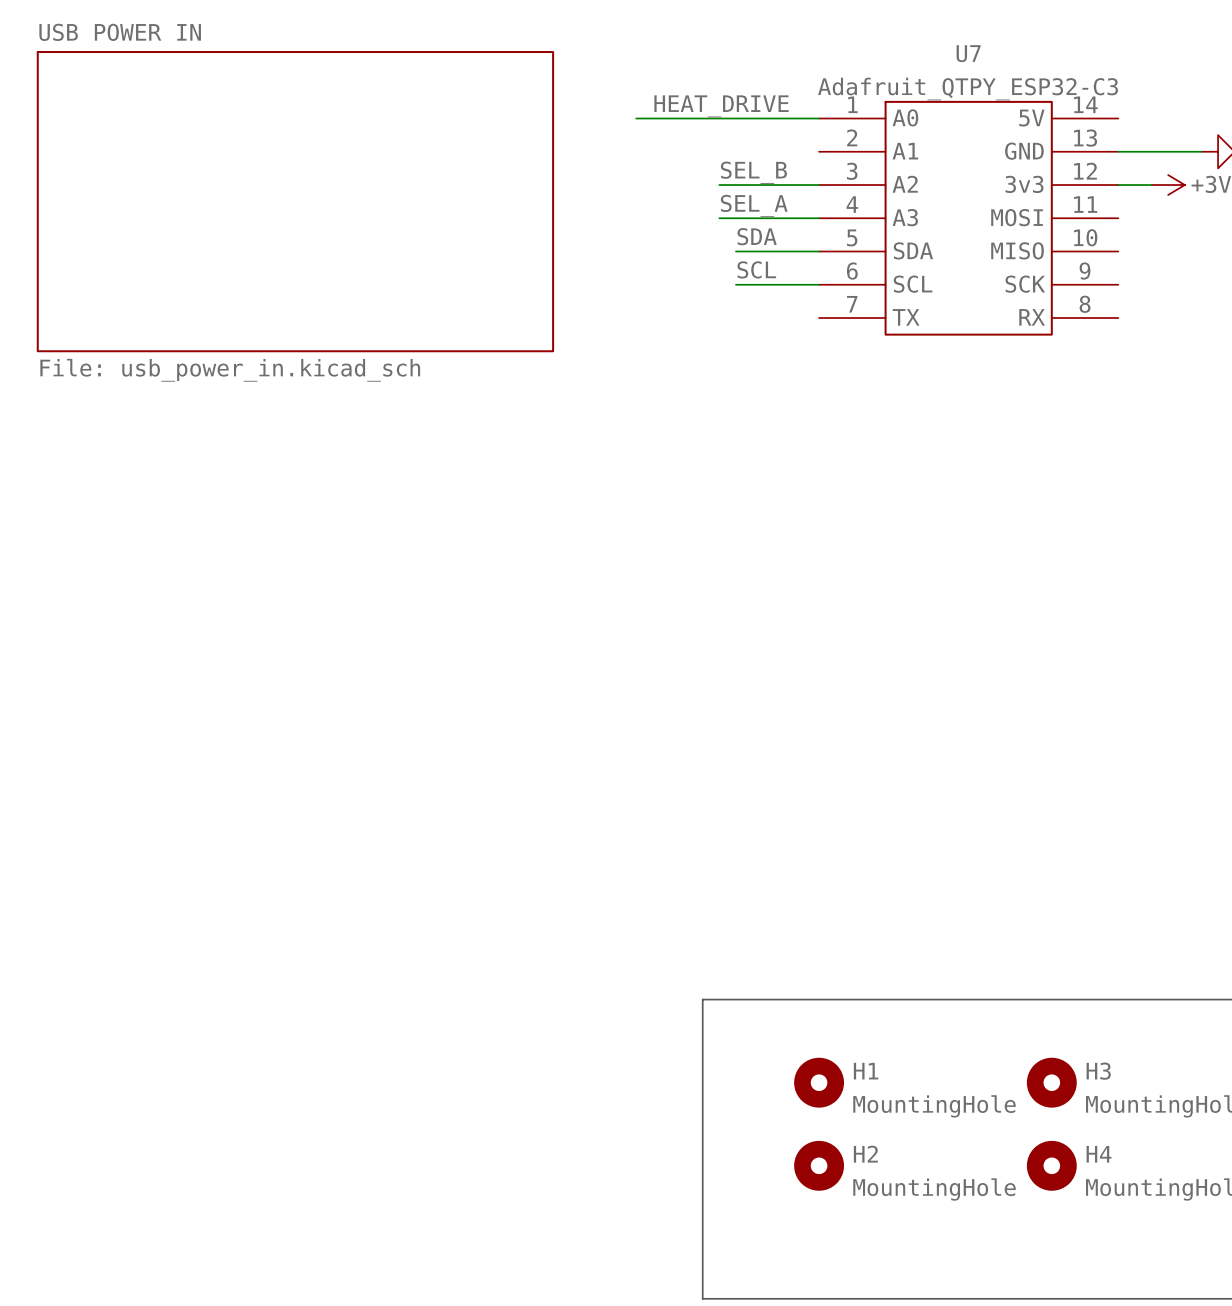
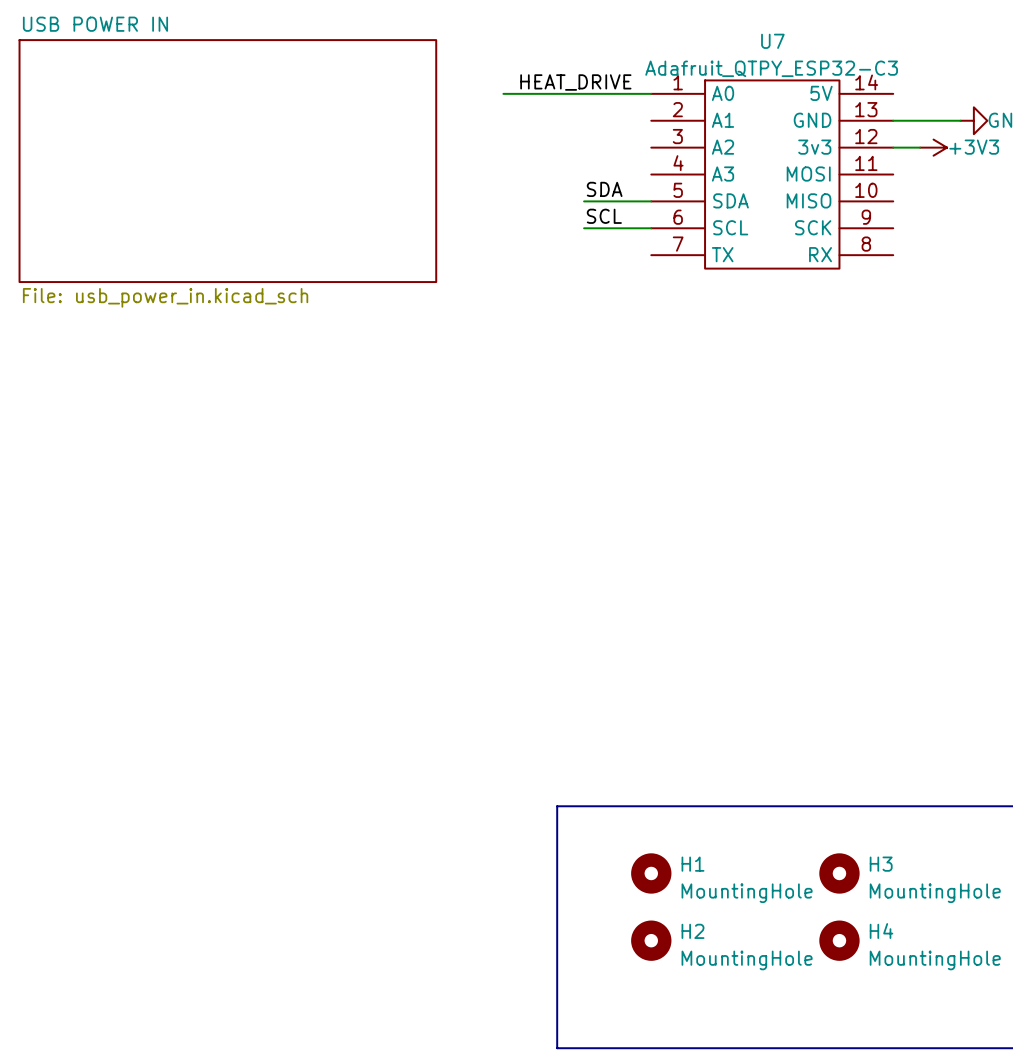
label: SEL_B (753, 172) -> none
wire: (719, 185) (819, 185) -> none
label: SEL_A (754, 205) -> none
wire: (719, 218) (819, 218) -> none

